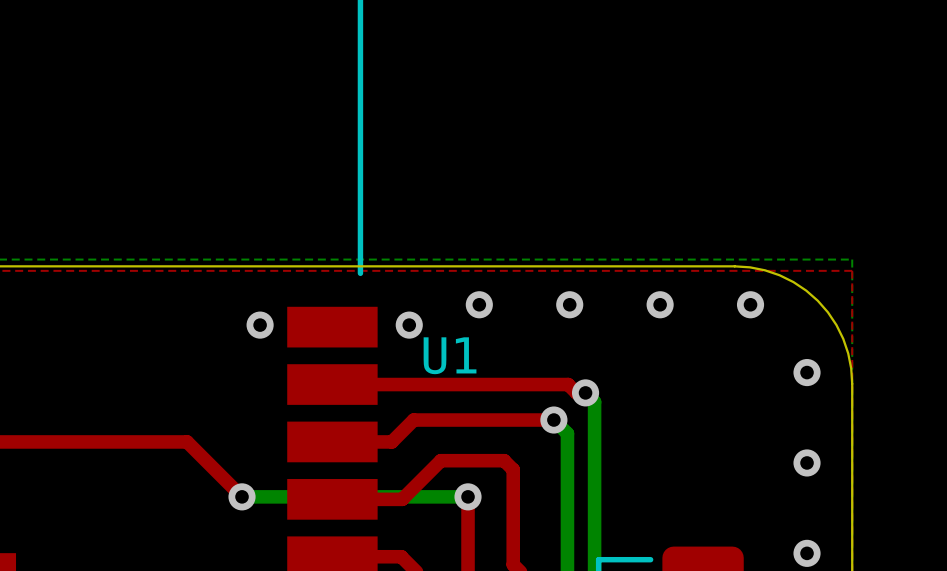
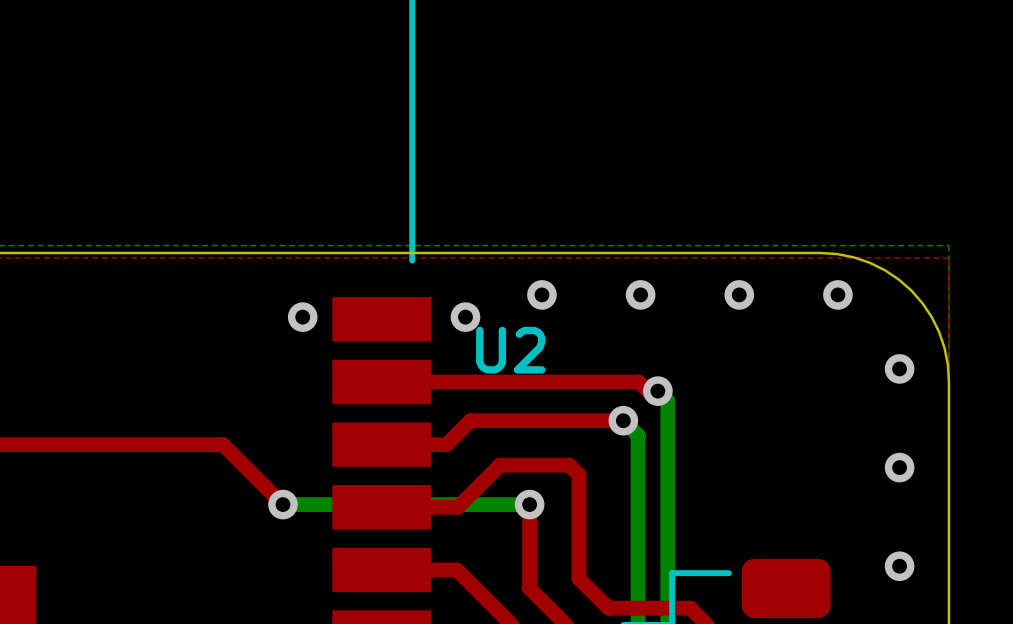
U1 name: U1 (450, 355) -> U2 (510, 350)

